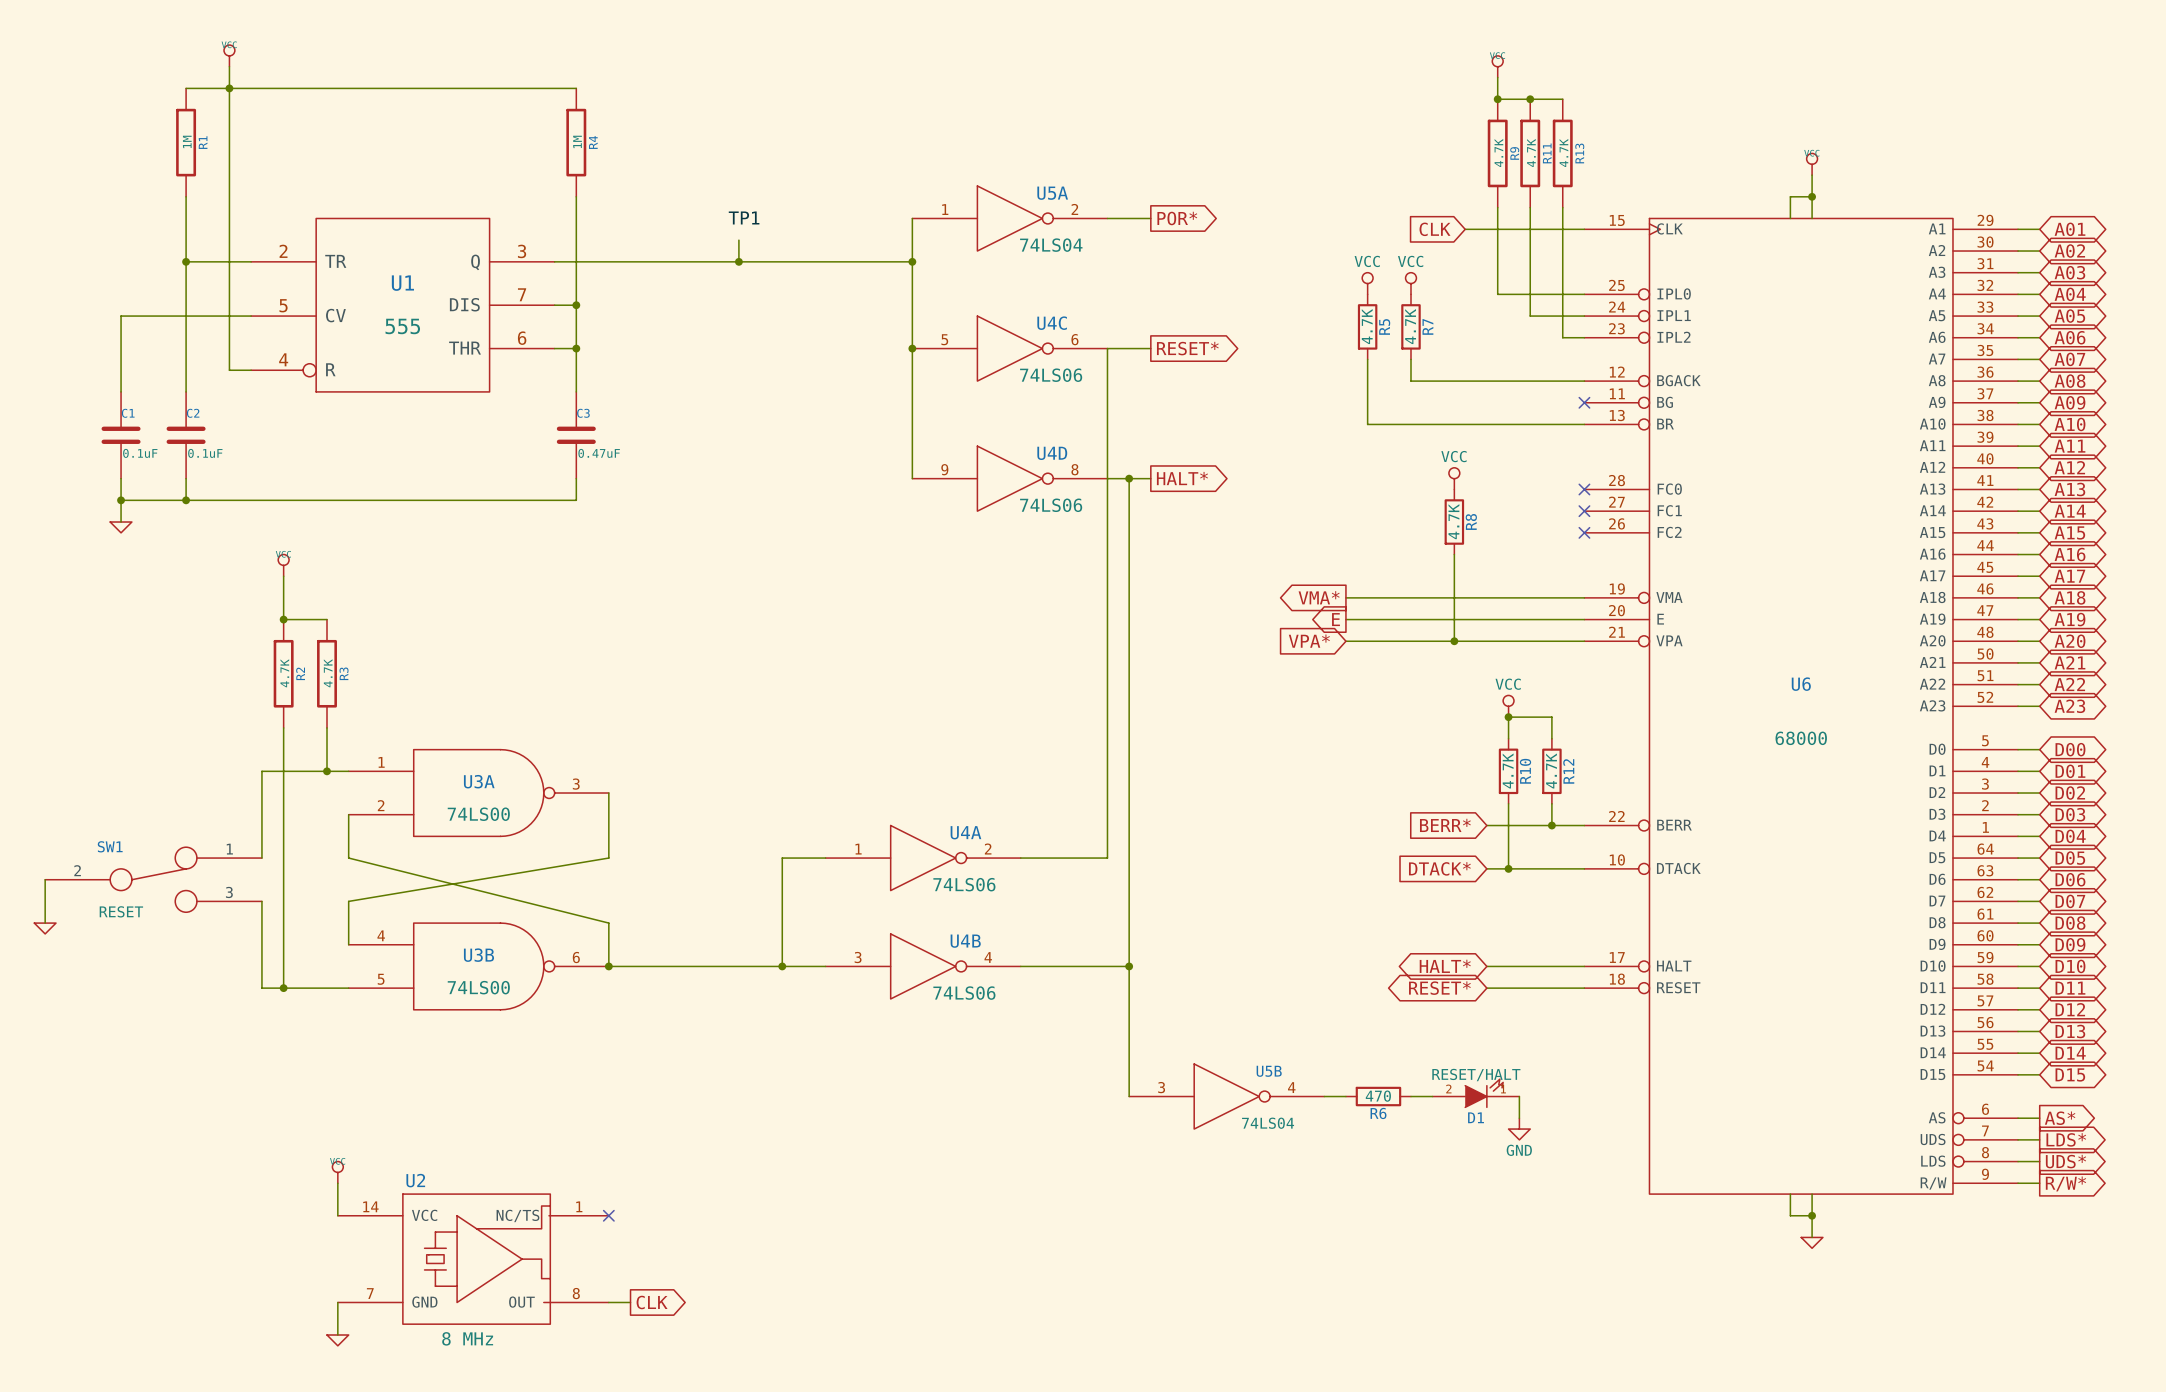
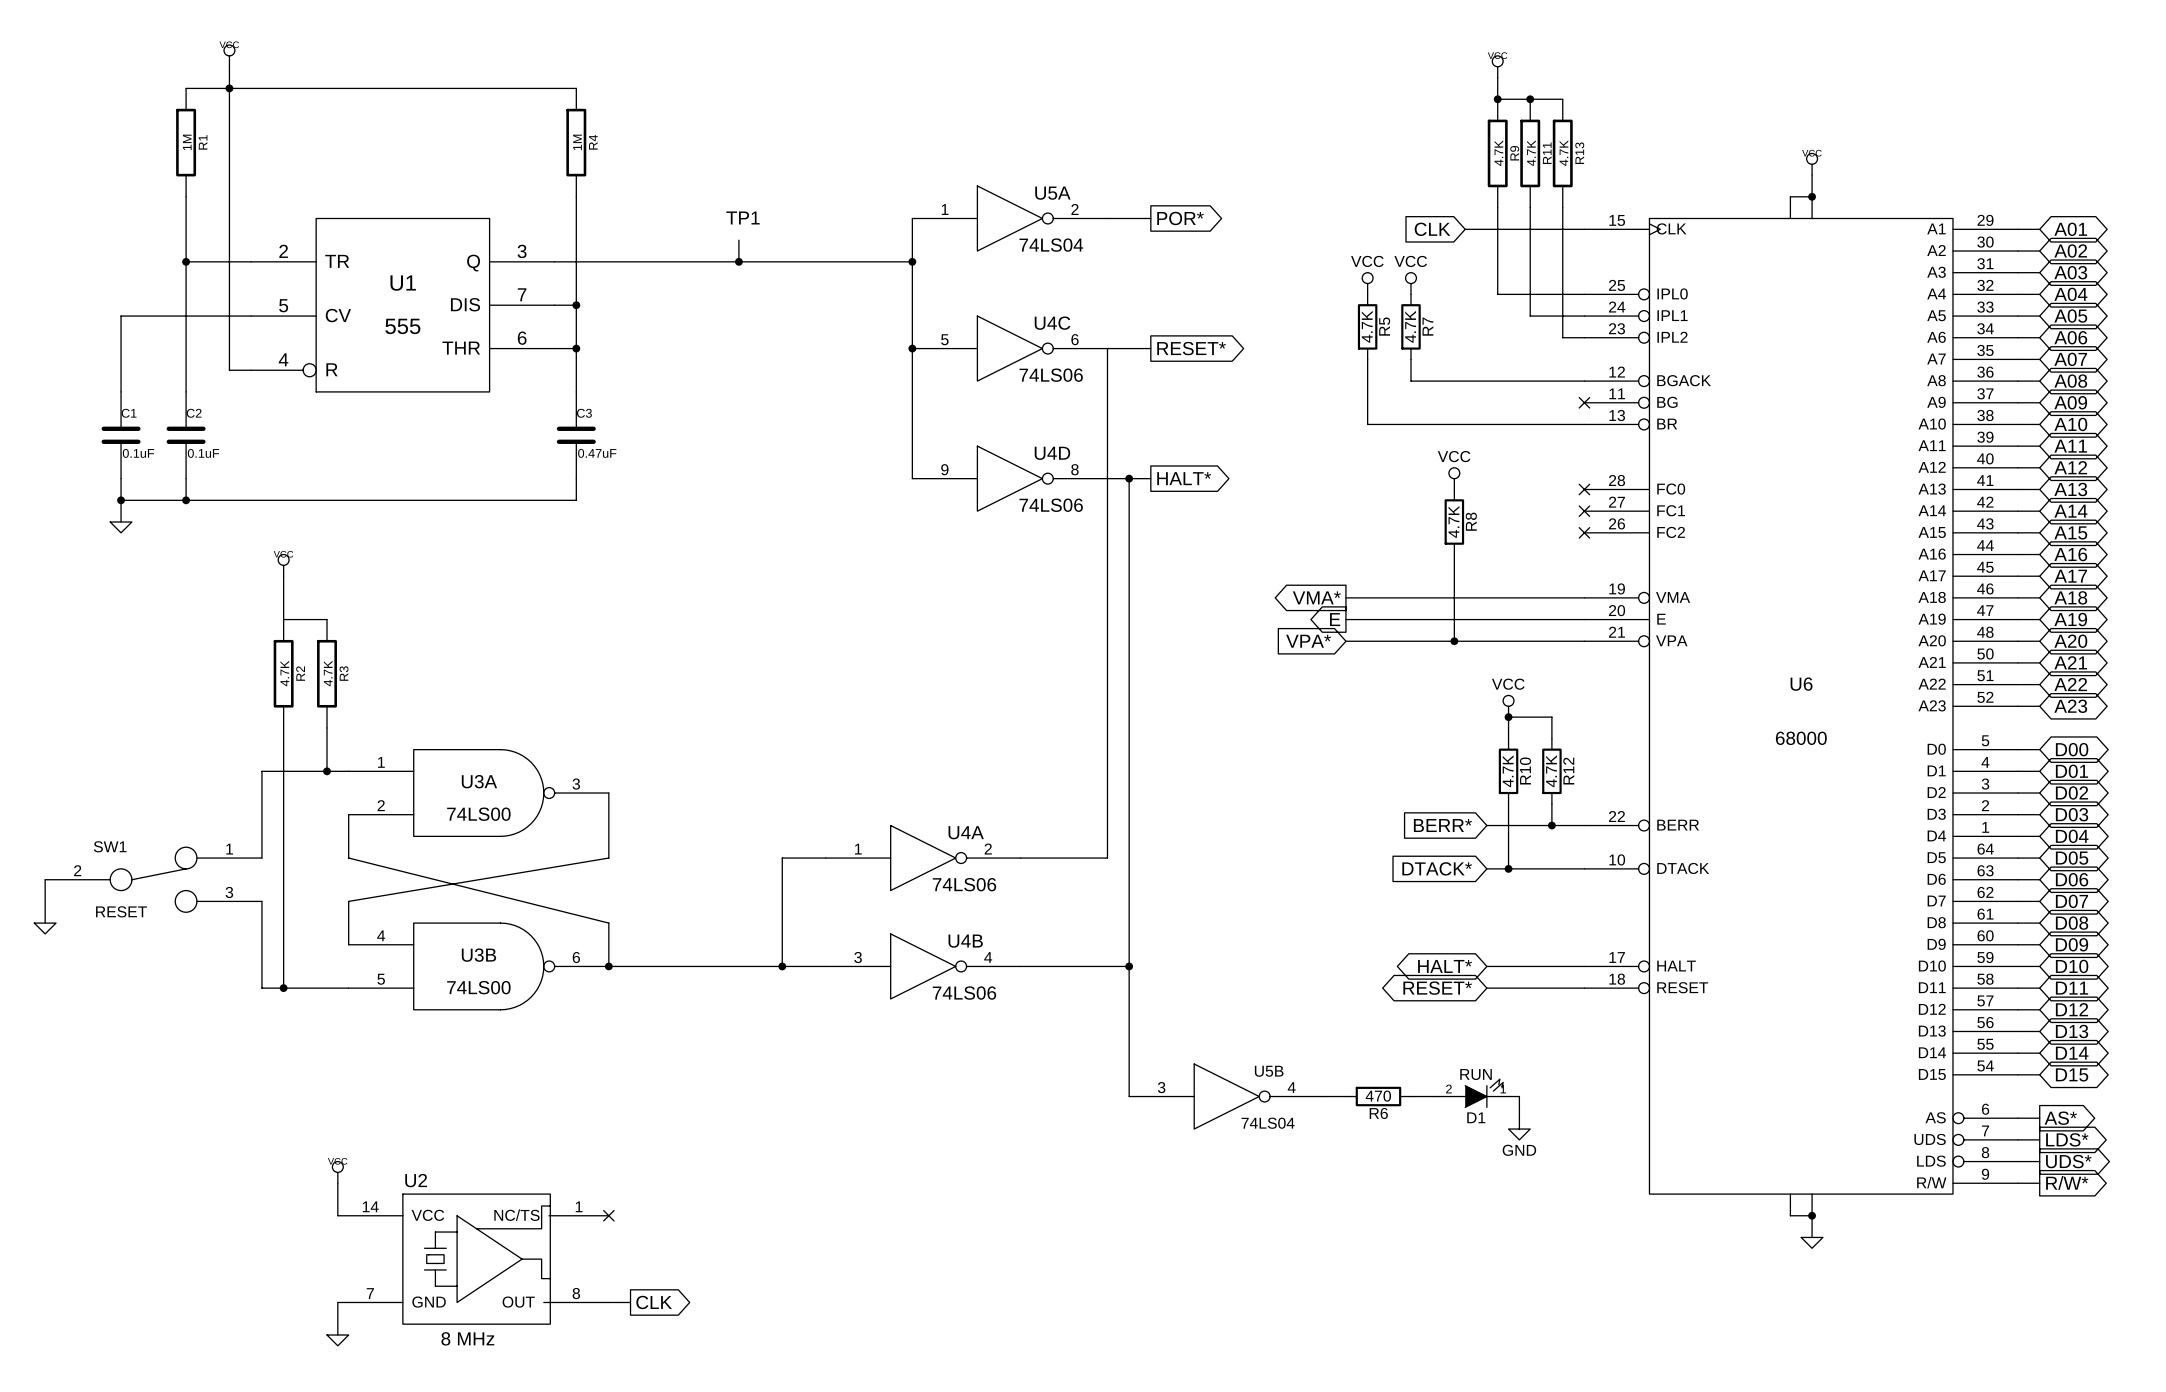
junction: (283, 619) -> none
D1 value: RESET/HALT (1476, 1075) -> RUN (1476, 1074)

